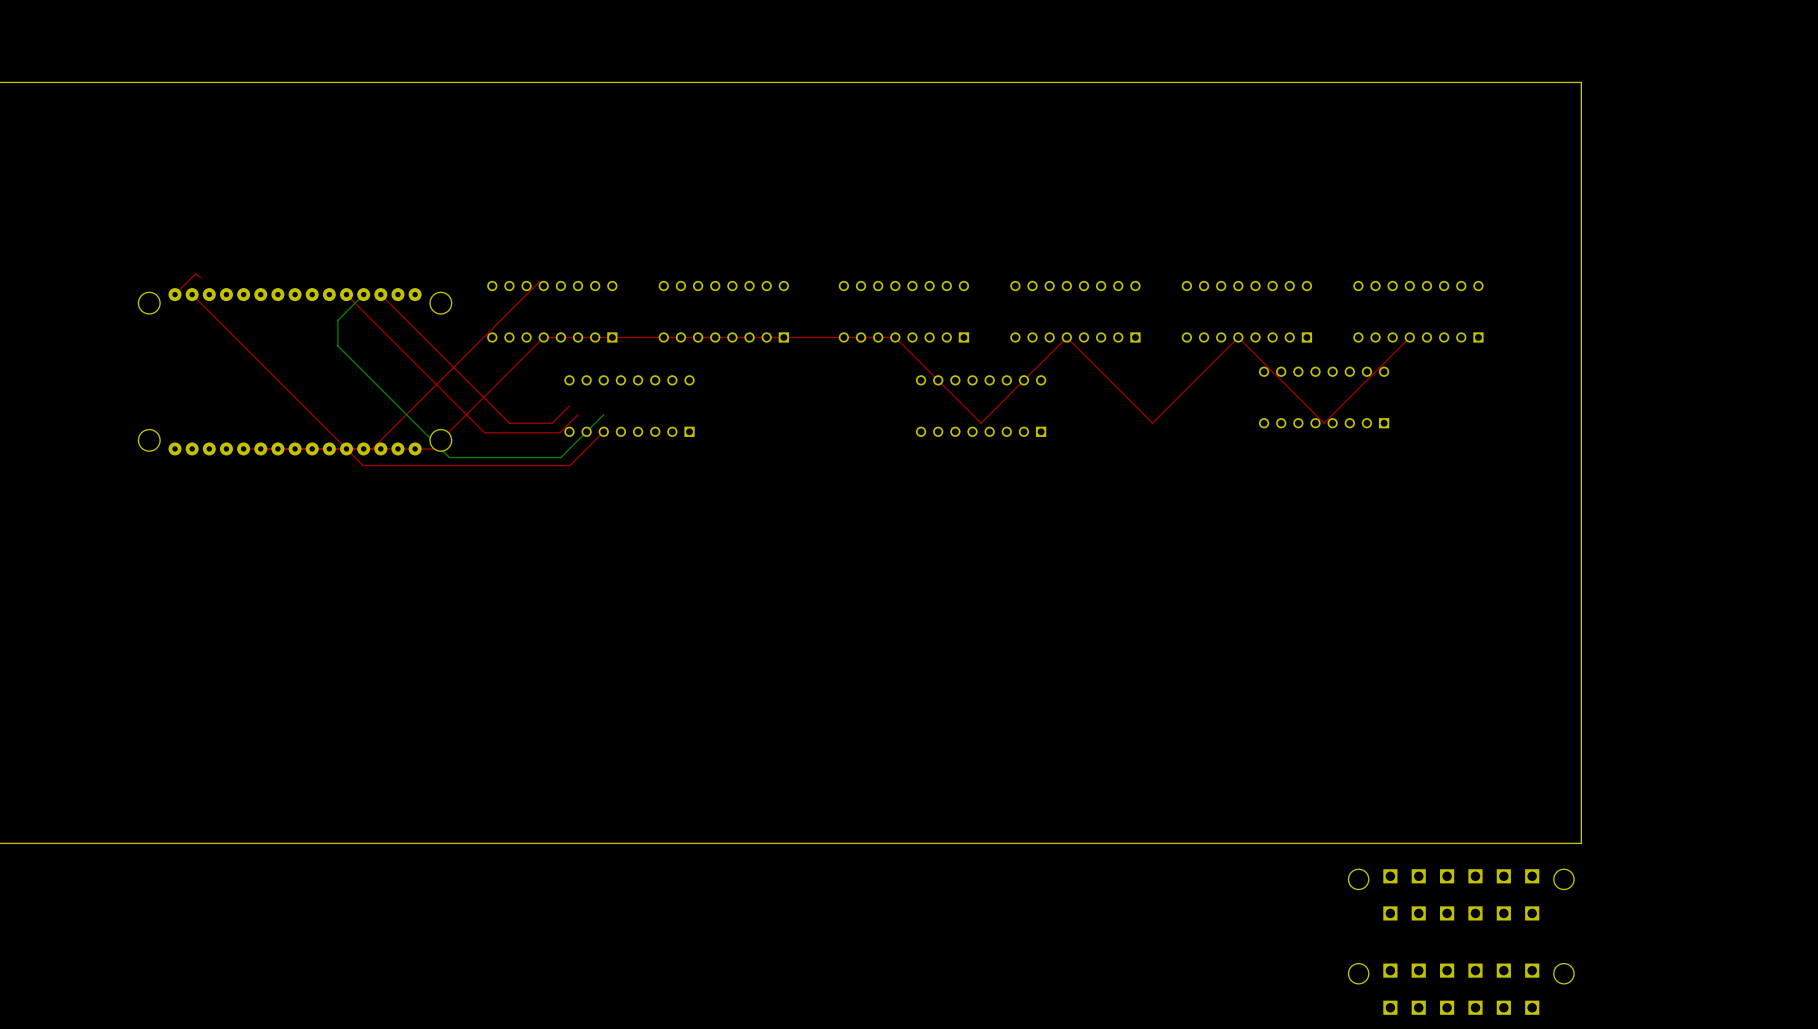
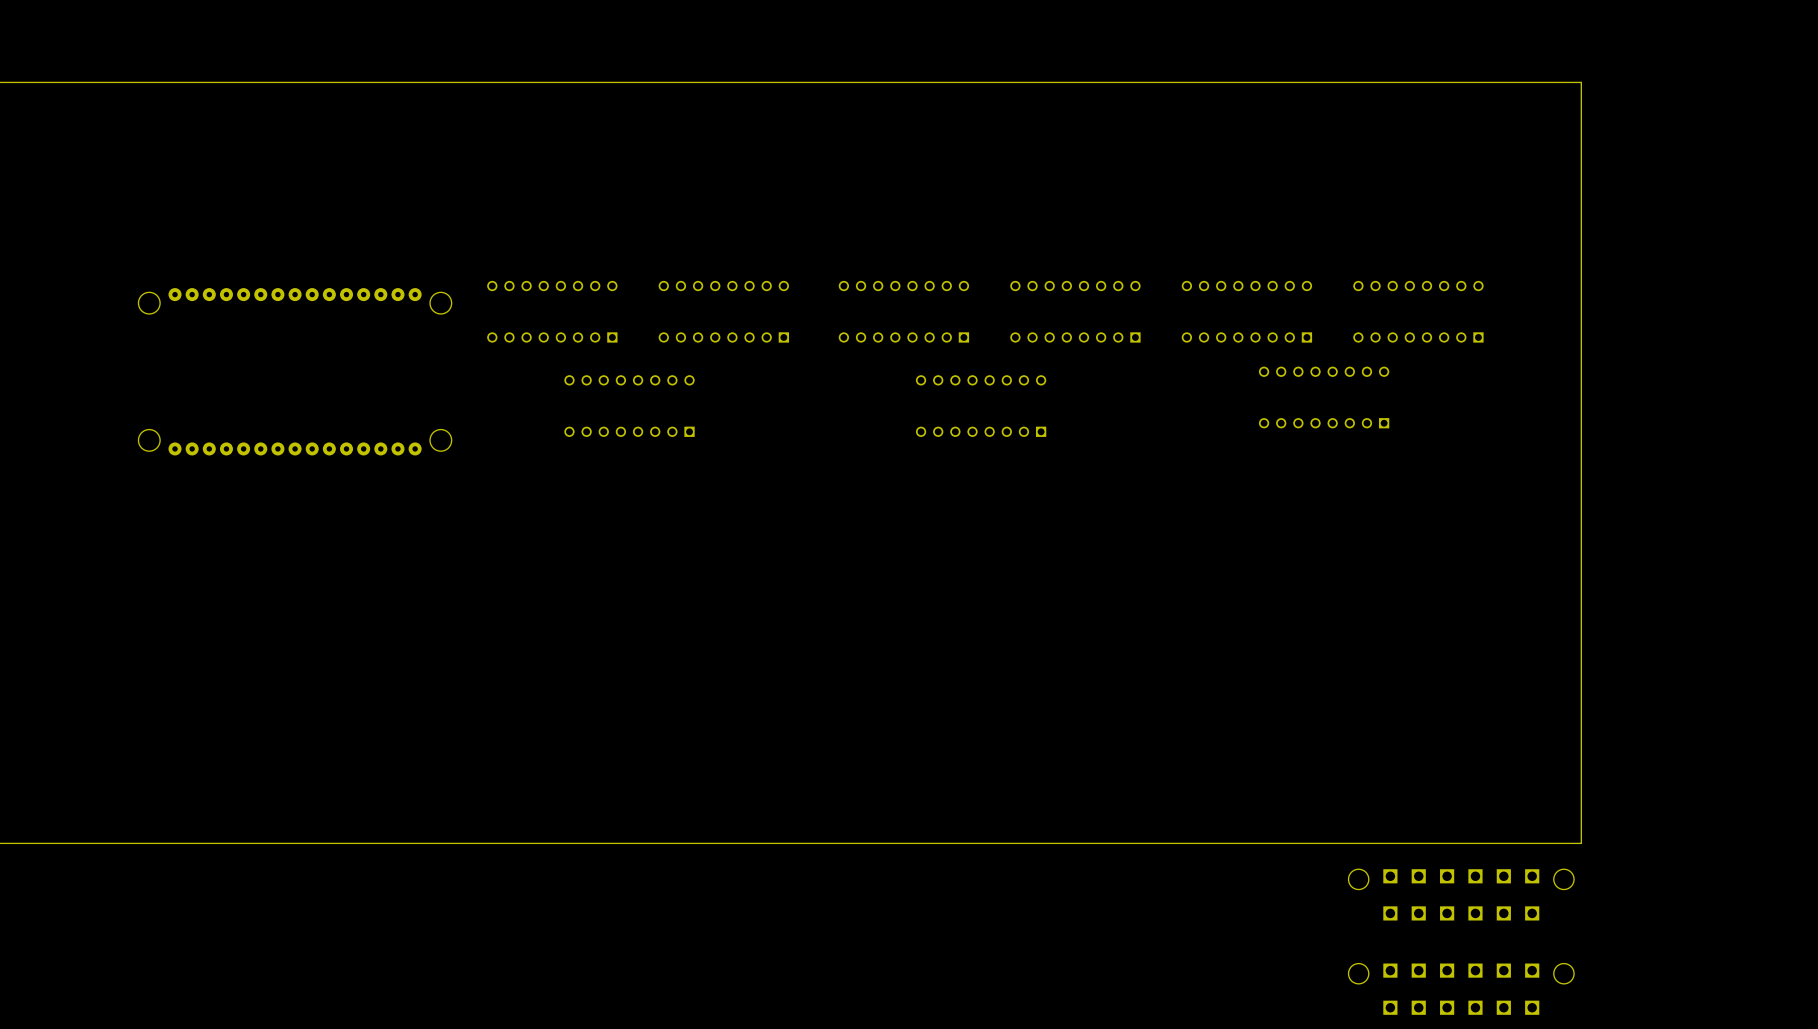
top track: (200, 277) (195, 274) (175, 294) -> none
top track: (543, 286) (539, 281) (372, 448) -> none
top track: (192, 294) (363, 465) (569, 465) (603, 431) -> none
top track: (346, 294) (484, 432) (559, 432) (578, 414) -> none
bottom track: (363, 294) (337, 320) (337, 346) (449, 457) (560, 457) (603, 414) -> none
top track: (380, 294) (509, 423) (552, 423) (569, 406) -> none
top track: (1409, 337) (1324, 423) (1238, 337) (1152, 423) (1066, 337) (981, 423) (895, 337) (543, 337) (432, 448) (243, 448) -> none

